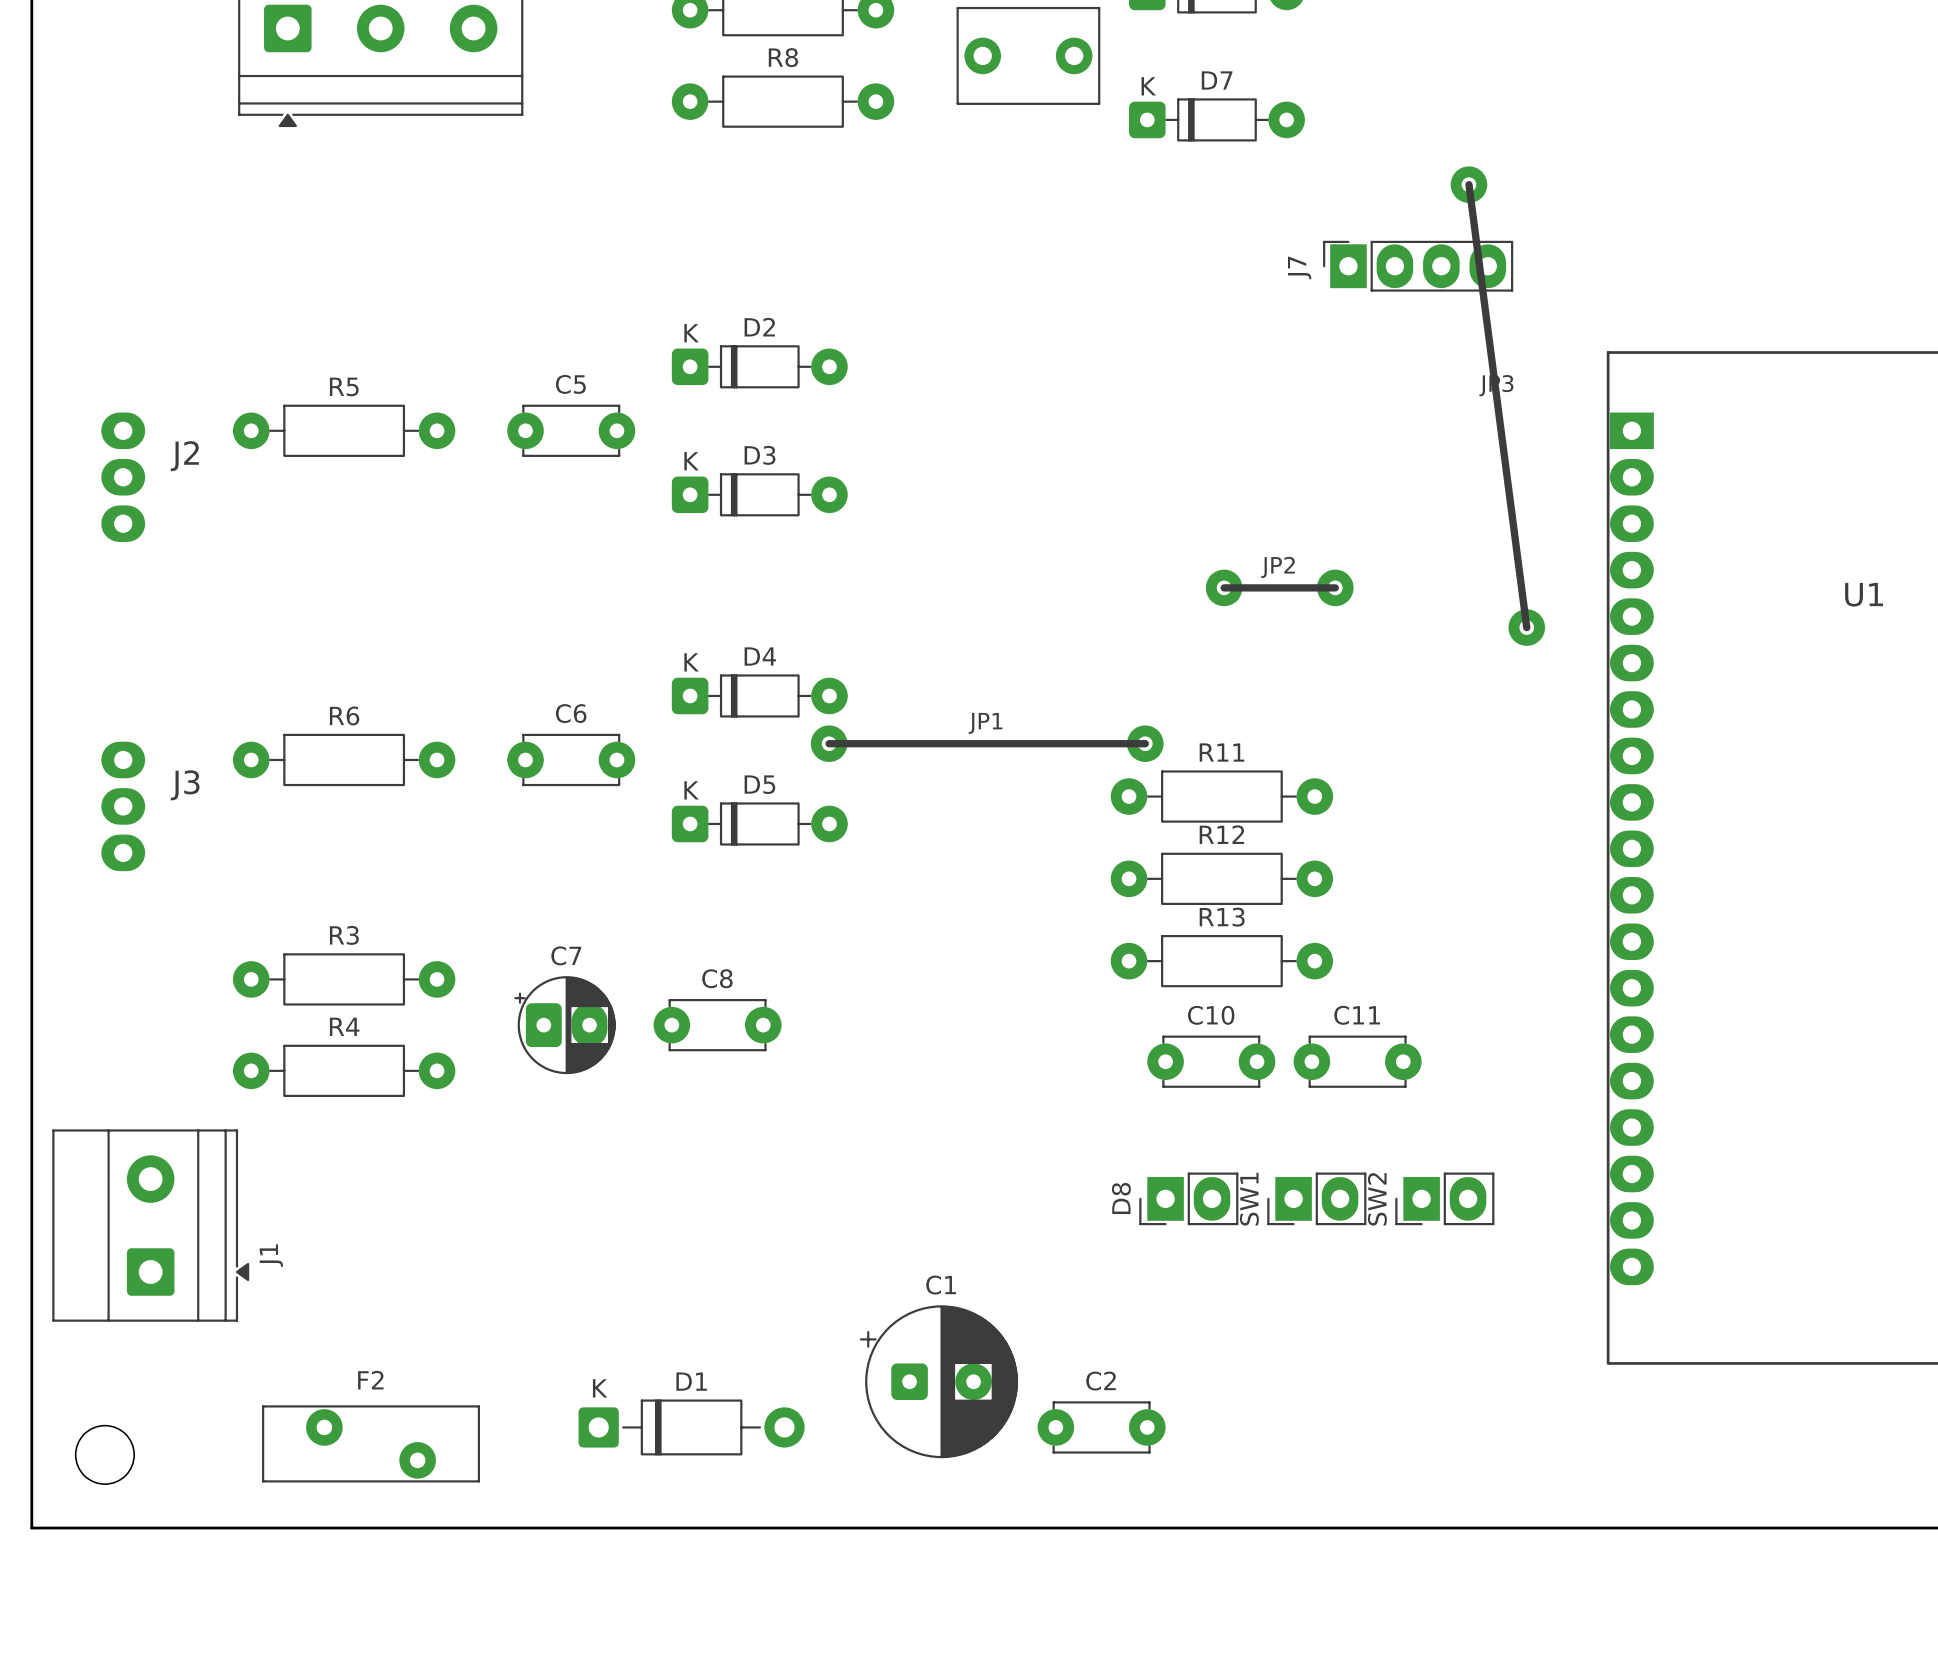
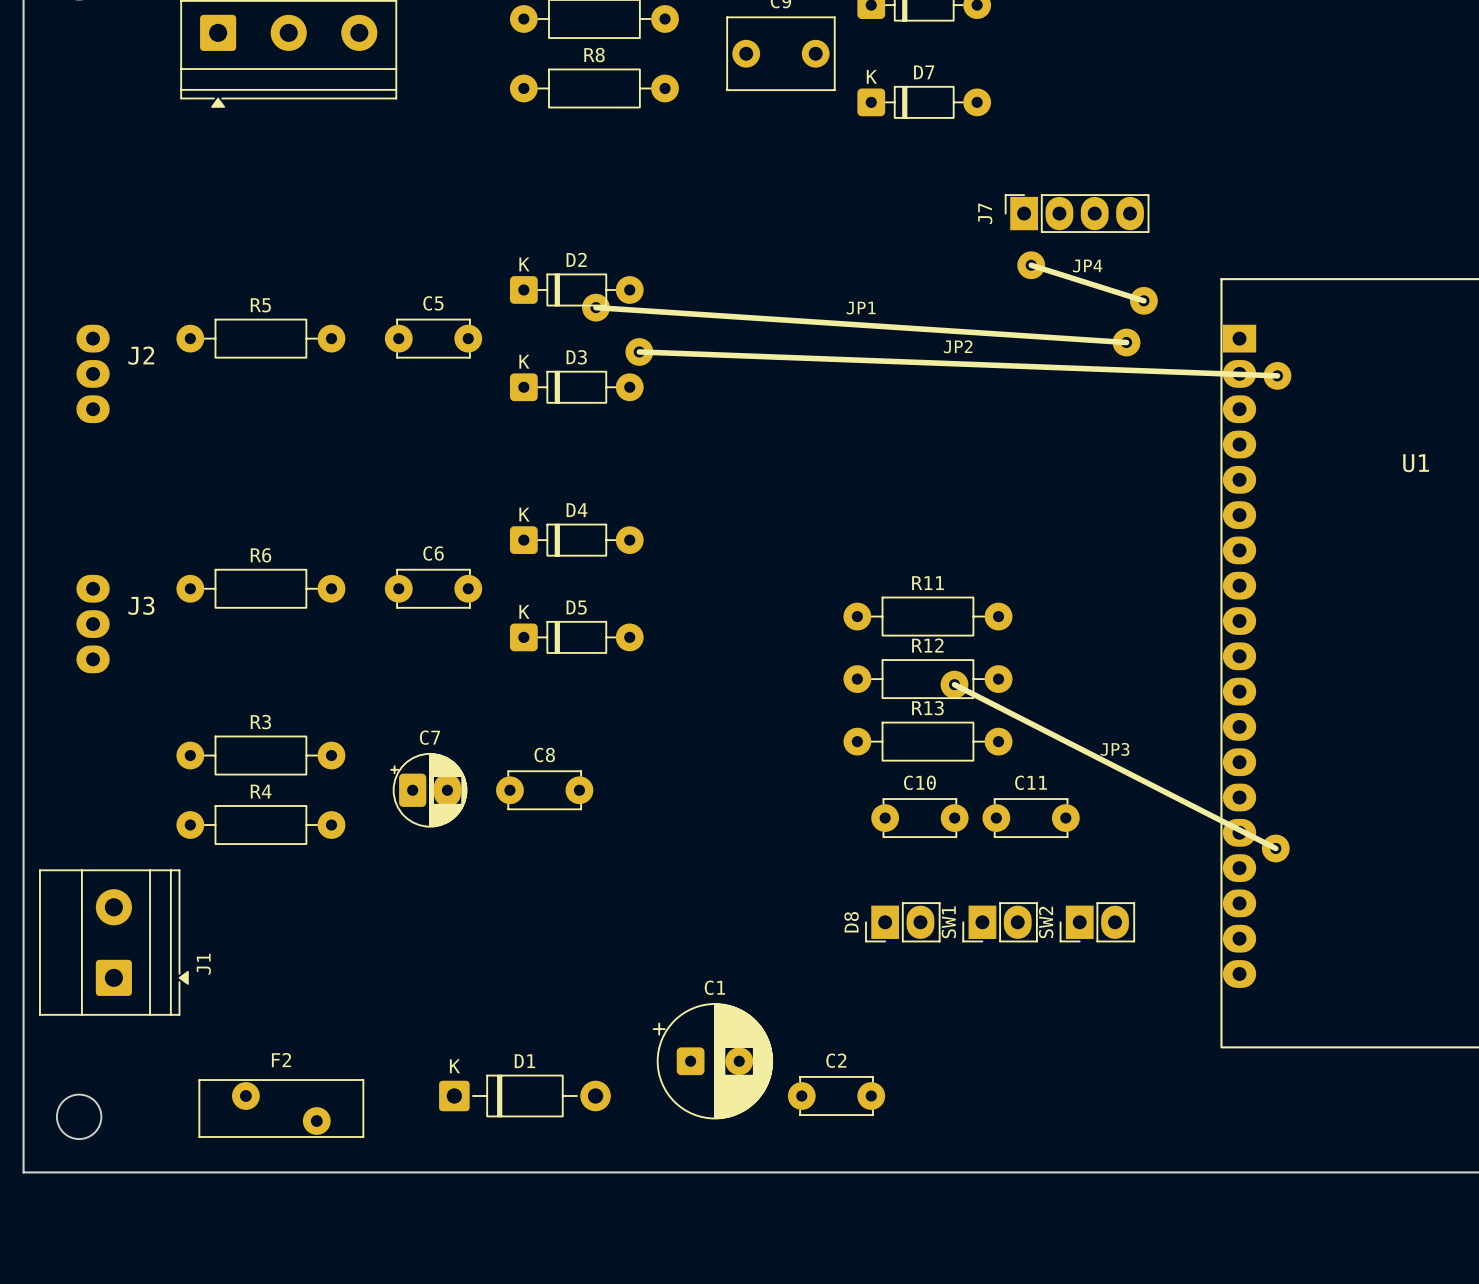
JP3 footprint: [1450, 166, 1546, 646] -> [940, 670, 1290, 863]
JP4: none -> (1087, 283)
JP2 footprint: [1205, 569, 1354, 607] -> [625, 338, 1292, 390]
JP1 footprint: [810, 725, 1164, 762] -> [582, 293, 1141, 357]

